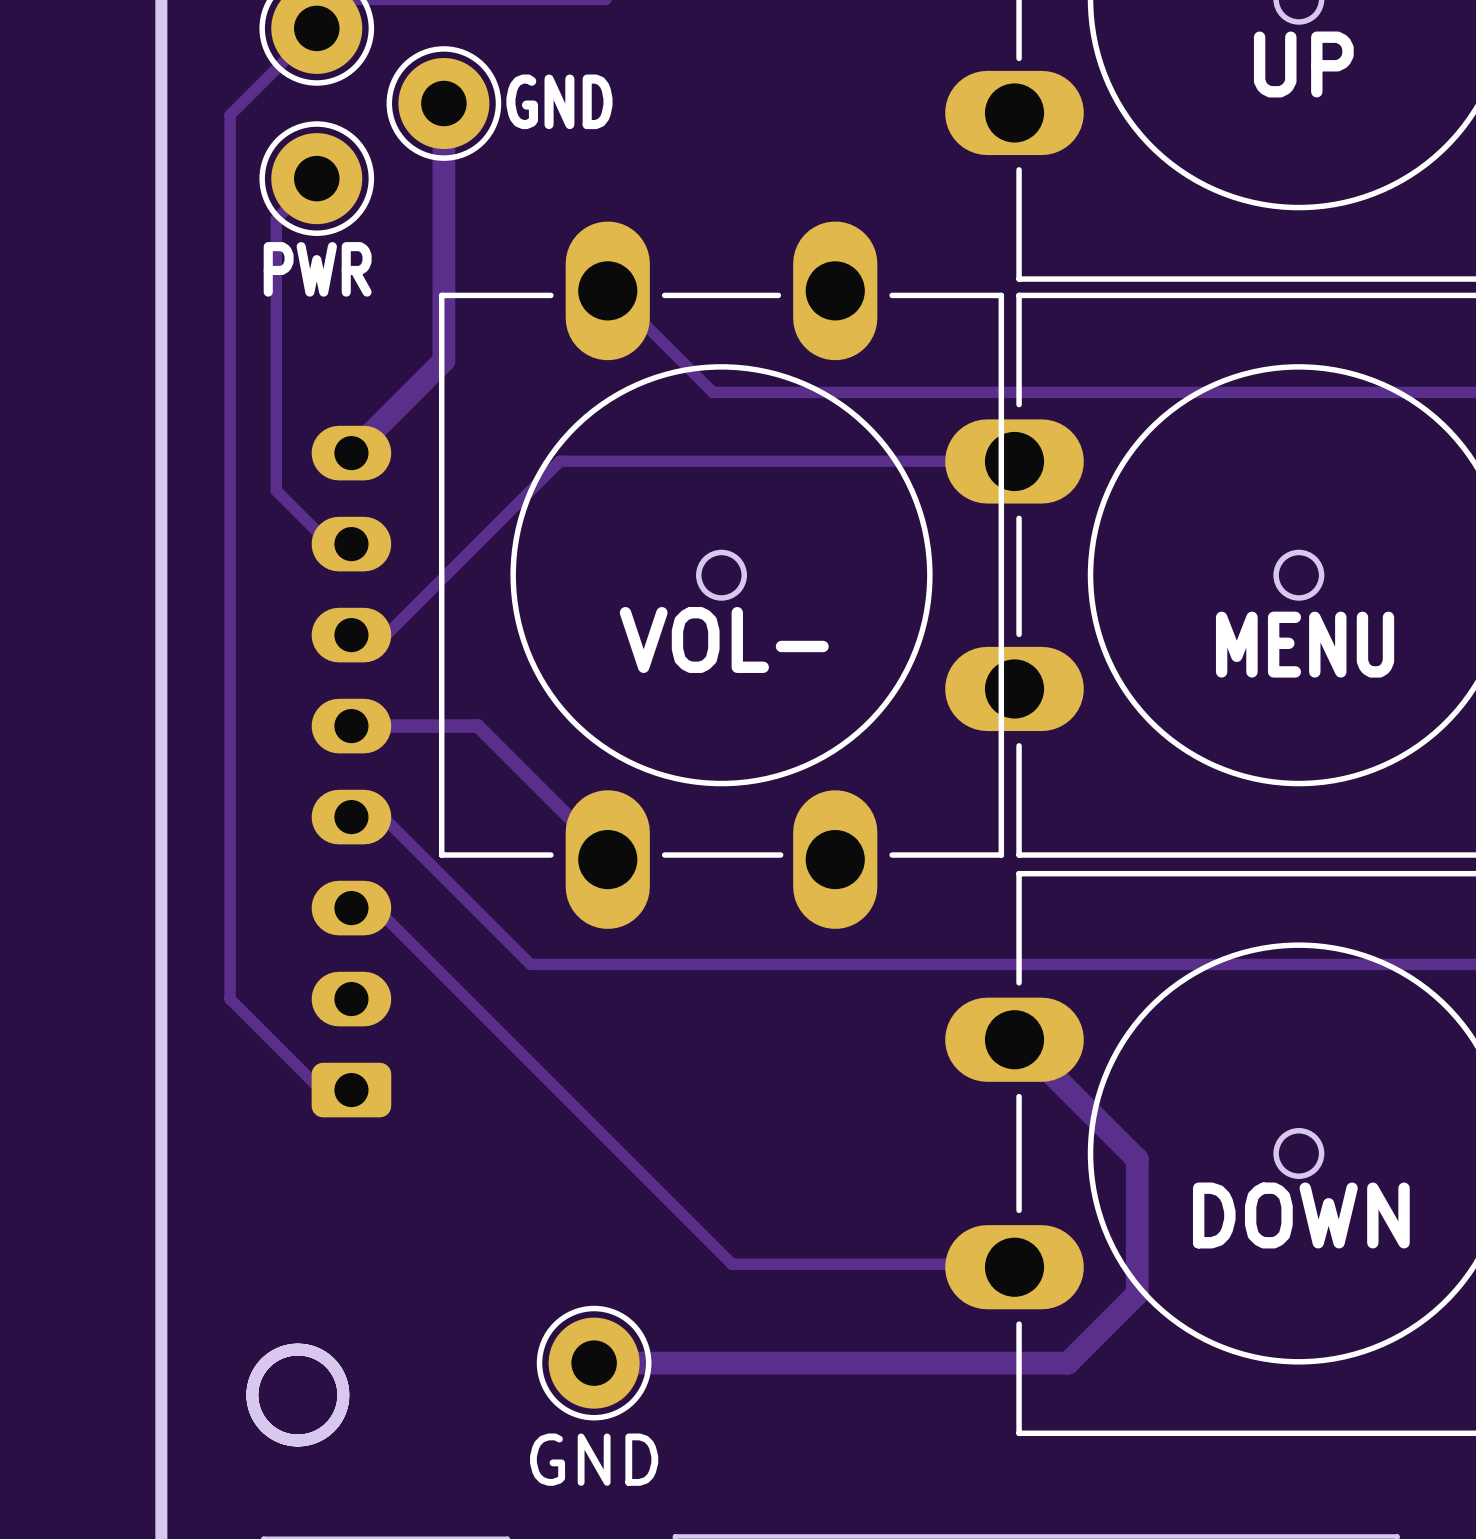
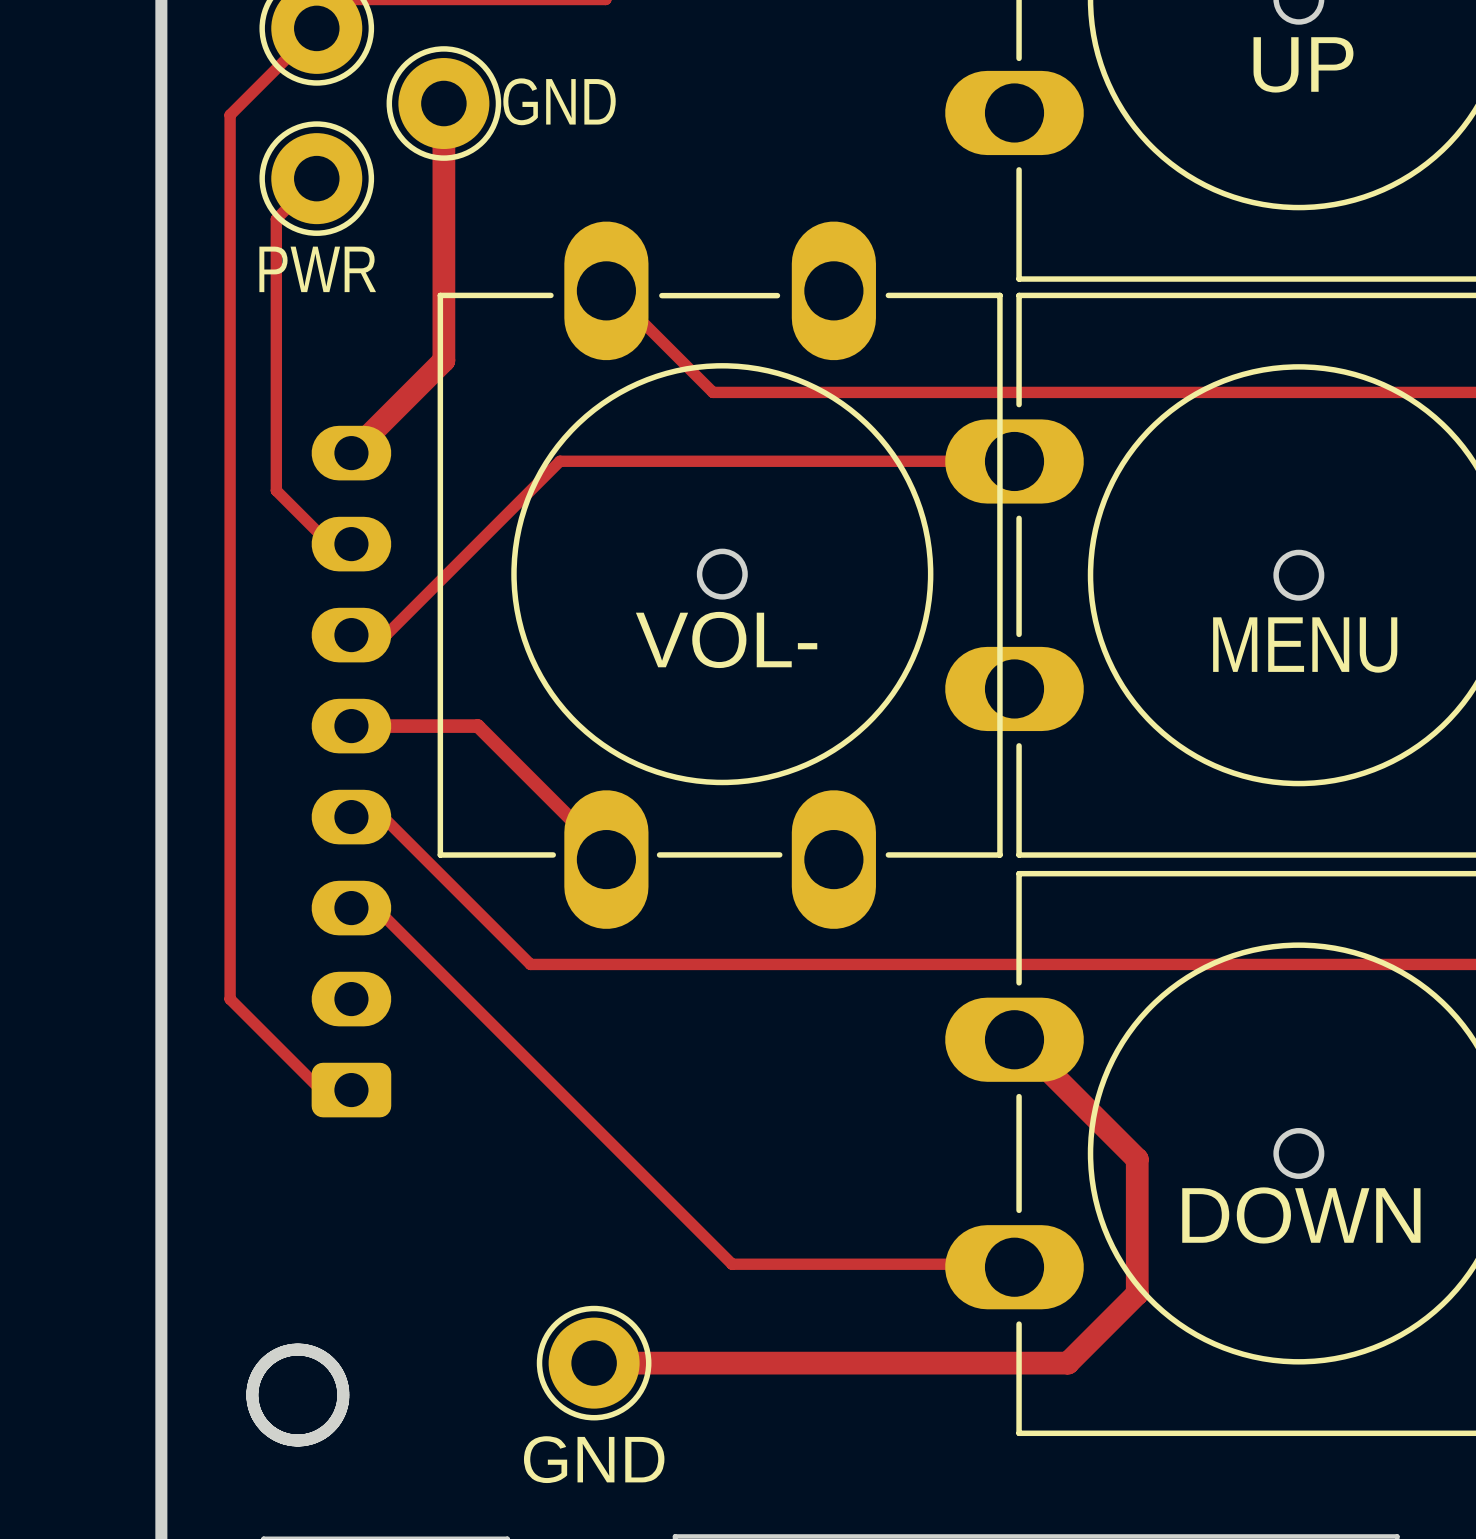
part footprint: [438, 221, 1005, 929] -> [437, 221, 1003, 929]

